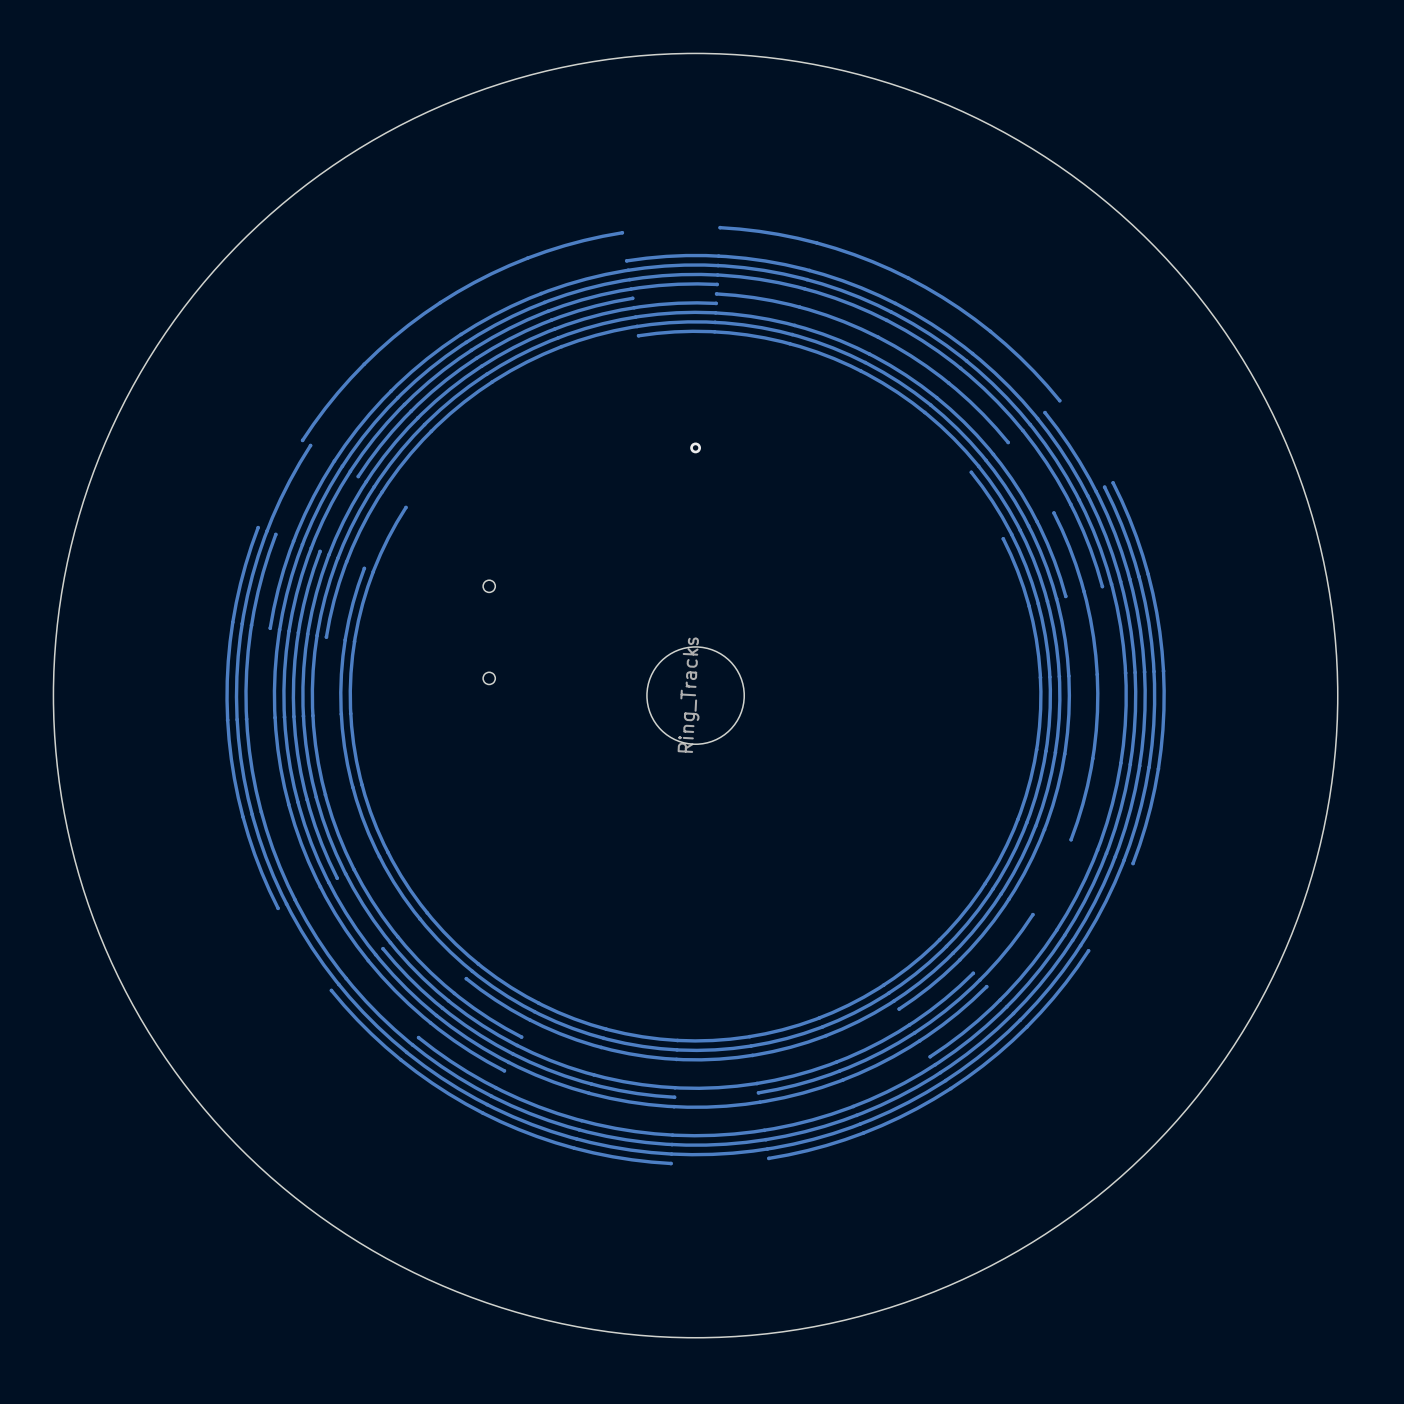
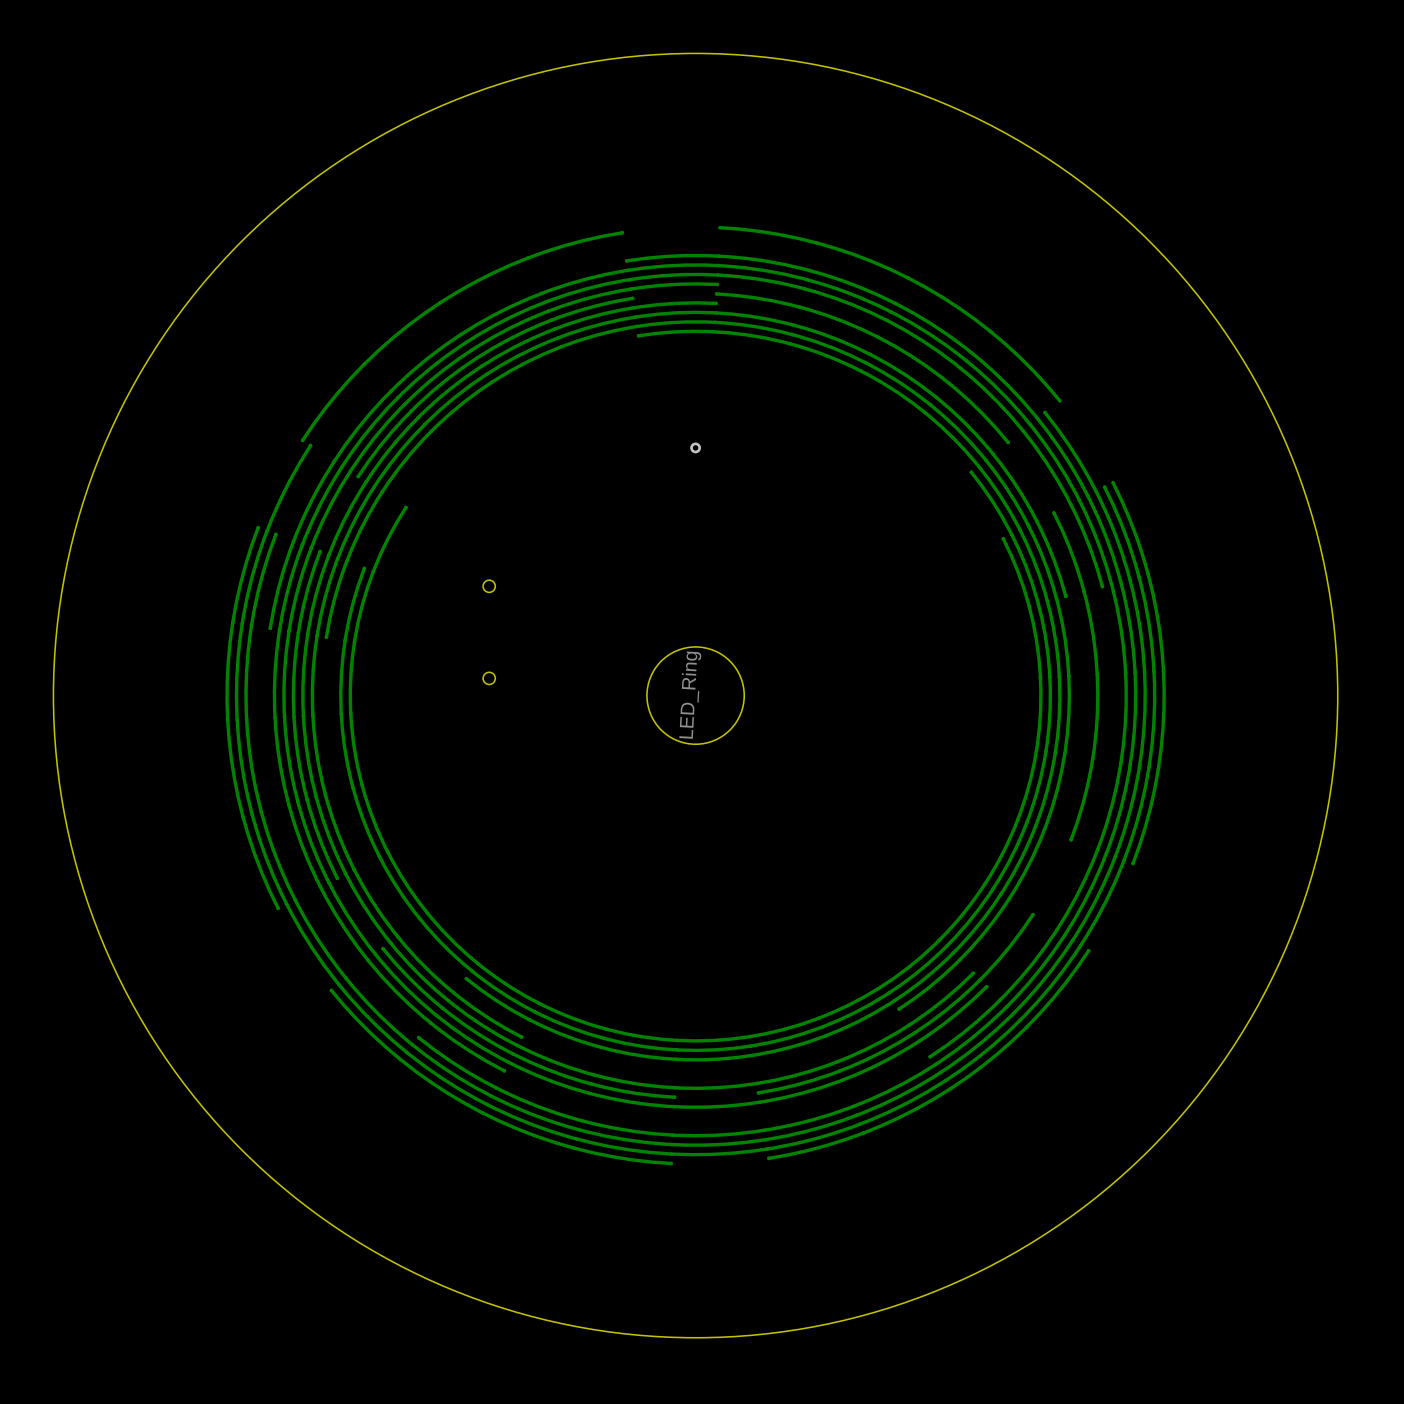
part value: Ring_Tracks (688, 695) -> LED_Ring (690, 695)

